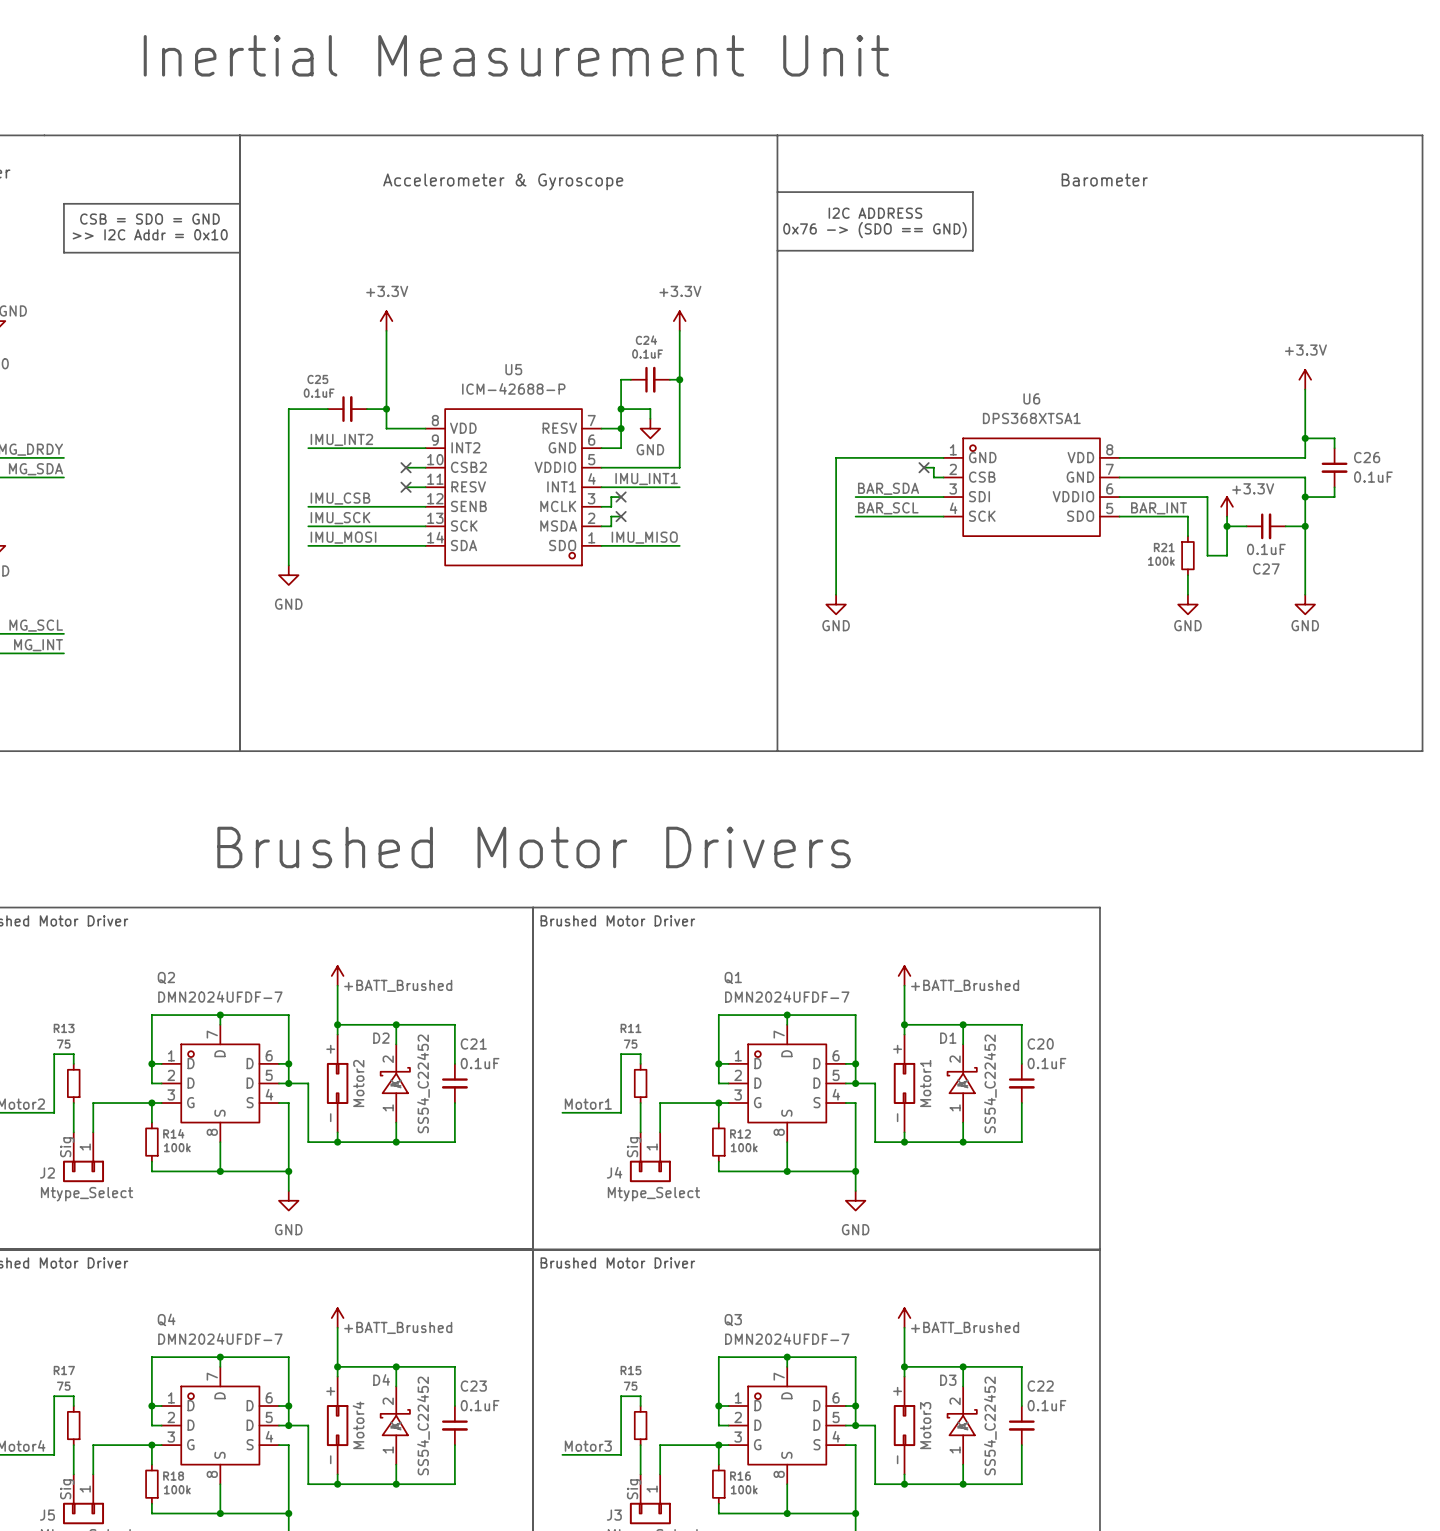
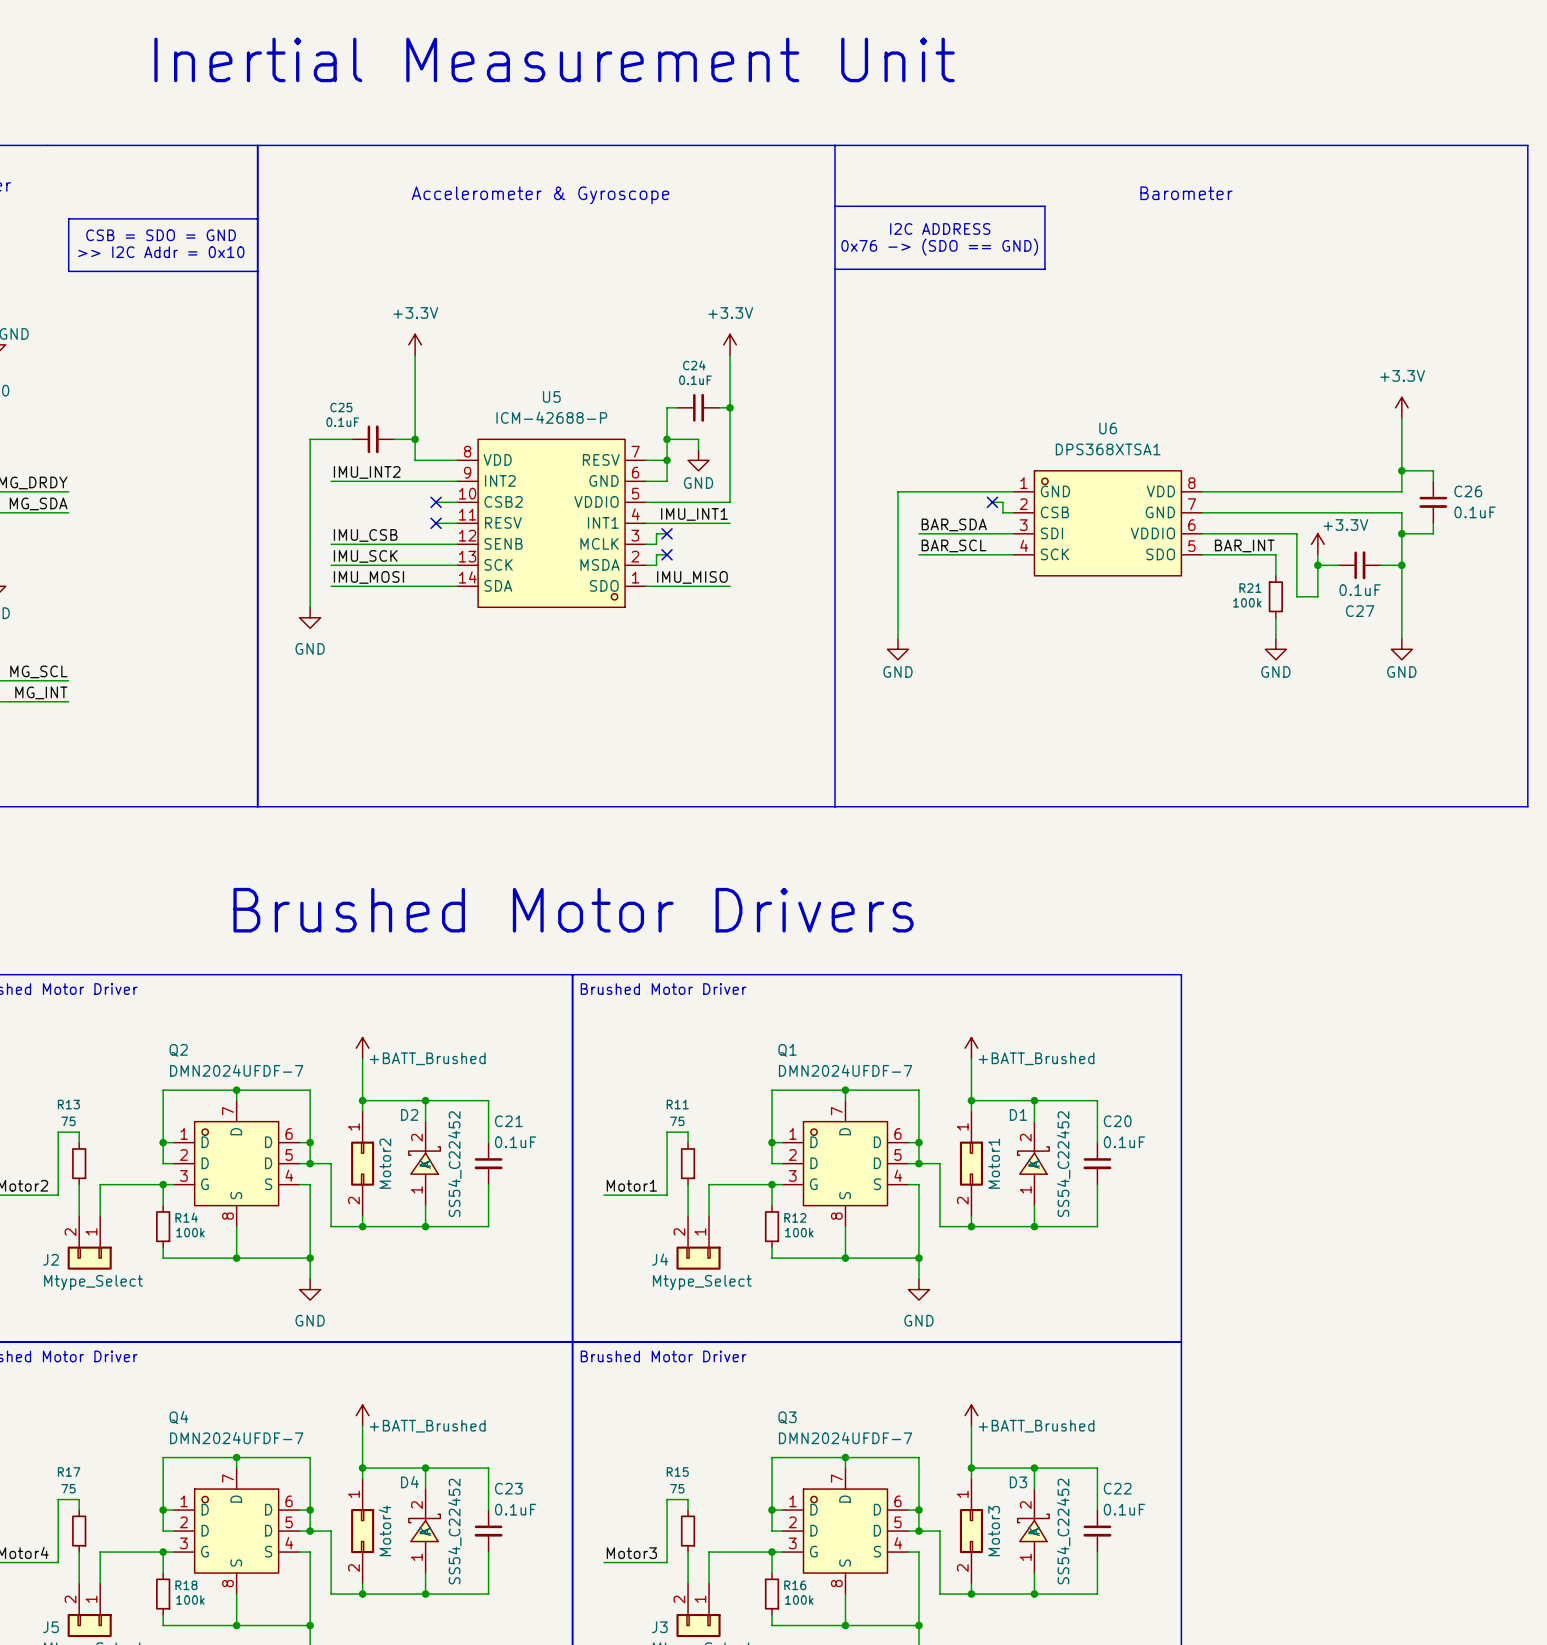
Motor2 pin number: + (330, 1049) -> 1 (353, 1126)
Motor1 pin number: + (897, 1049) -> 1 (962, 1126)
Motor2 pin number: - (330, 1117) -> 2 (353, 1200)
Motor1 pin number: - (897, 1117) -> 2 (962, 1200)
J2 pin number: Sig (67, 1147) -> 2 (70, 1232)
J4 pin number: Sig (634, 1147) -> 2 (679, 1232)
Motor4 pin number: + (330, 1391) -> 1 (353, 1494)
Motor3 pin number: + (897, 1391) -> 1 (962, 1494)
Motor4 pin number: - (330, 1459) -> 2 (353, 1568)
Motor3 pin number: - (897, 1459) -> 2 (962, 1568)
J5 pin number: Sig (67, 1489) -> 2 (70, 1599)
J3 pin number: Sig (634, 1489) -> 2 (679, 1599)

